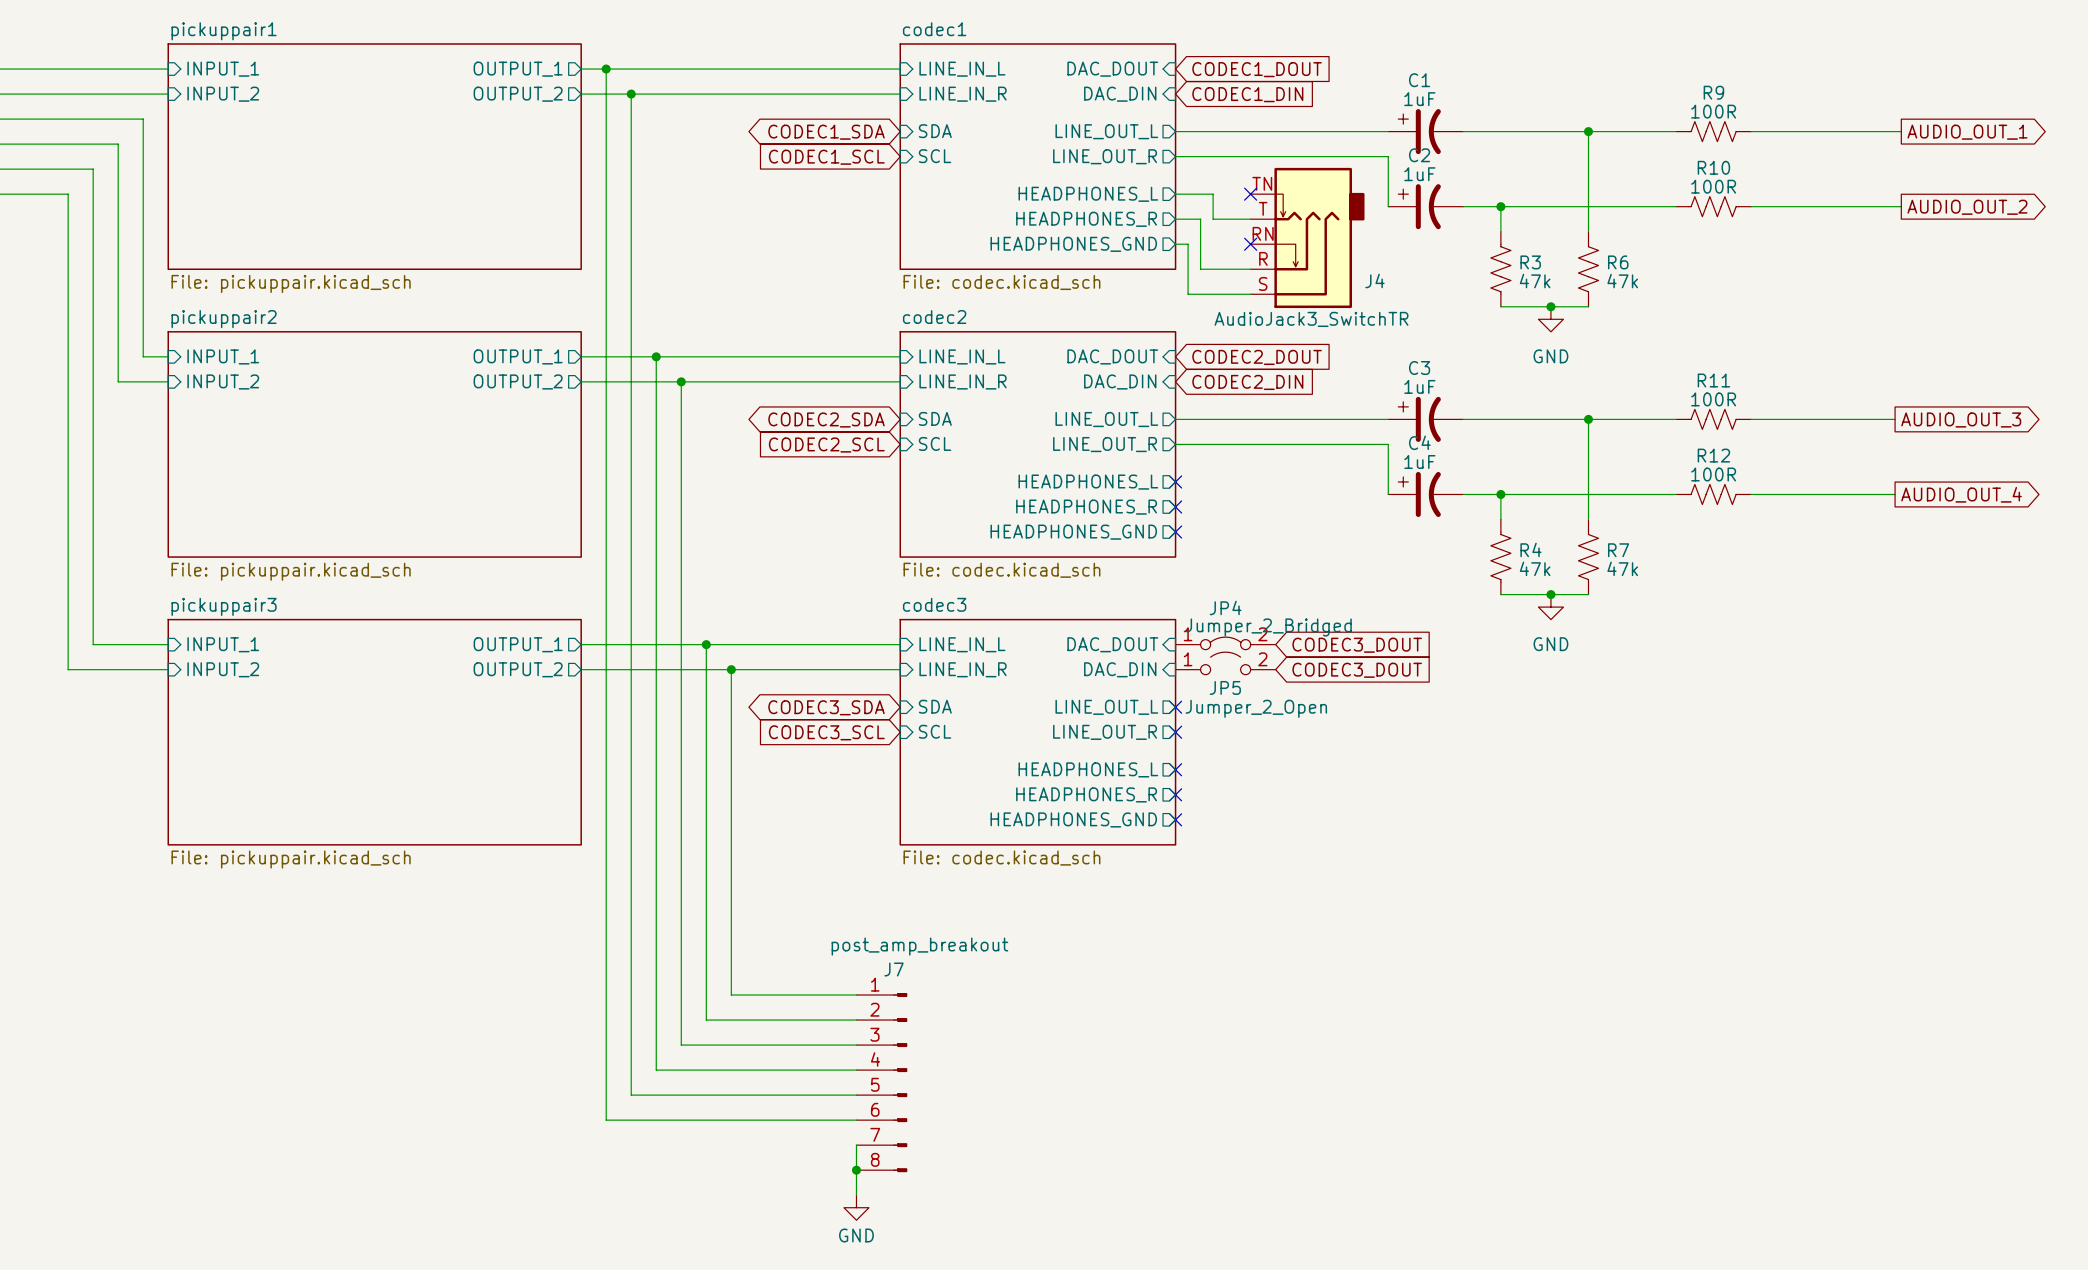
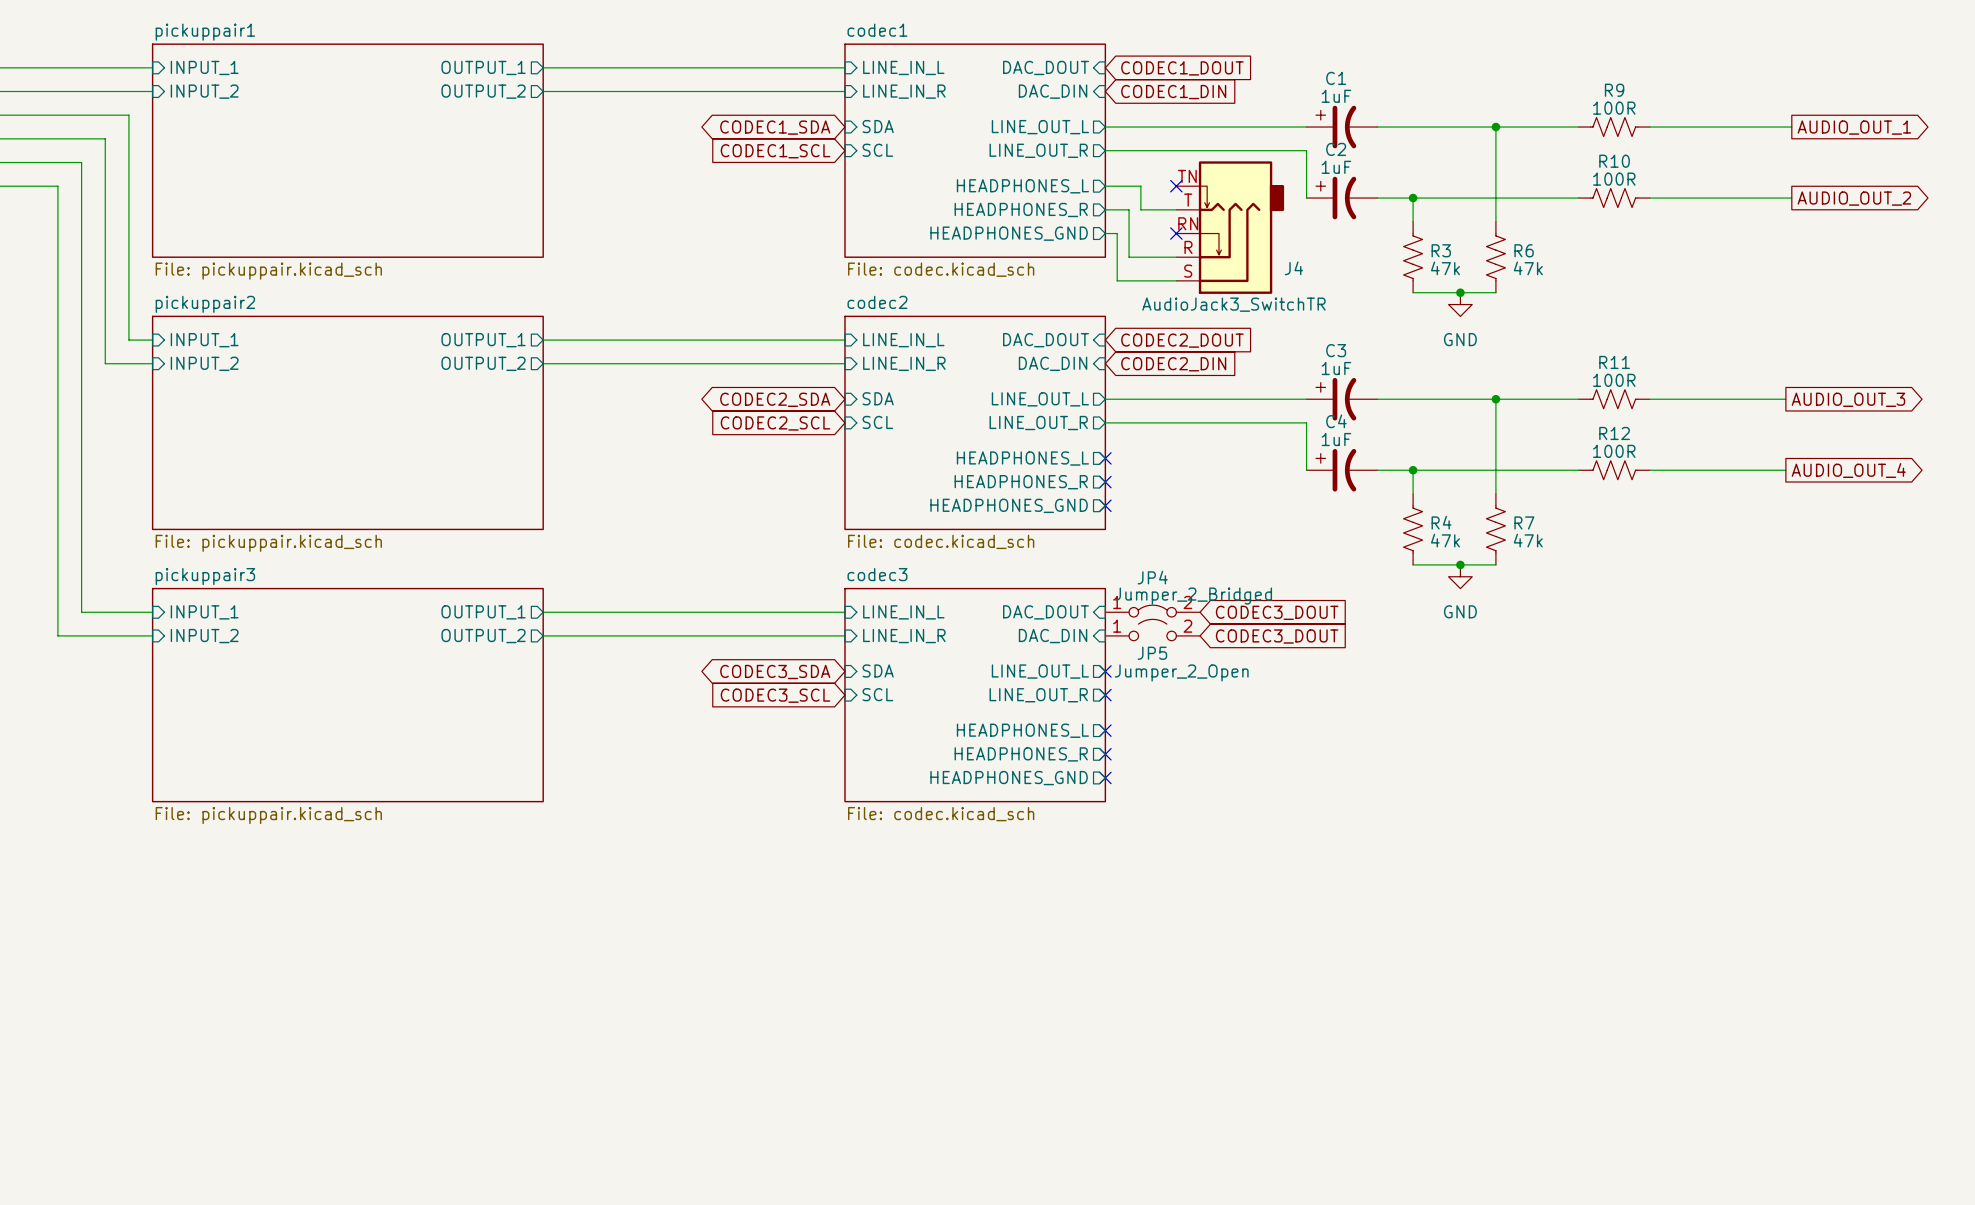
wire: (606, 69) (606, 1120) (856, 1120) -> none
junction: (606, 69) -> none
wire: (631, 94) (631, 1095) (856, 1095) -> none
junction: (631, 94) -> none
wire: (656, 356) (656, 1070) (856, 1070) -> none
junction: (656, 356) -> none
wire: (681, 381) (681, 1045) (856, 1045) -> none
junction: (681, 381) -> none
wire: (706, 644) (706, 1020) (856, 1020) -> none
junction: (706, 644) -> none
wire: (731, 669) (731, 995) (856, 995) -> none
junction: (731, 669) -> none
J7: post_amp_breakout (881, 1082) -> none
wire: (856, 1145) (856, 1195) -> none
junction: (856, 1170) -> none
power symbol: GND (856, 1207) -> none

